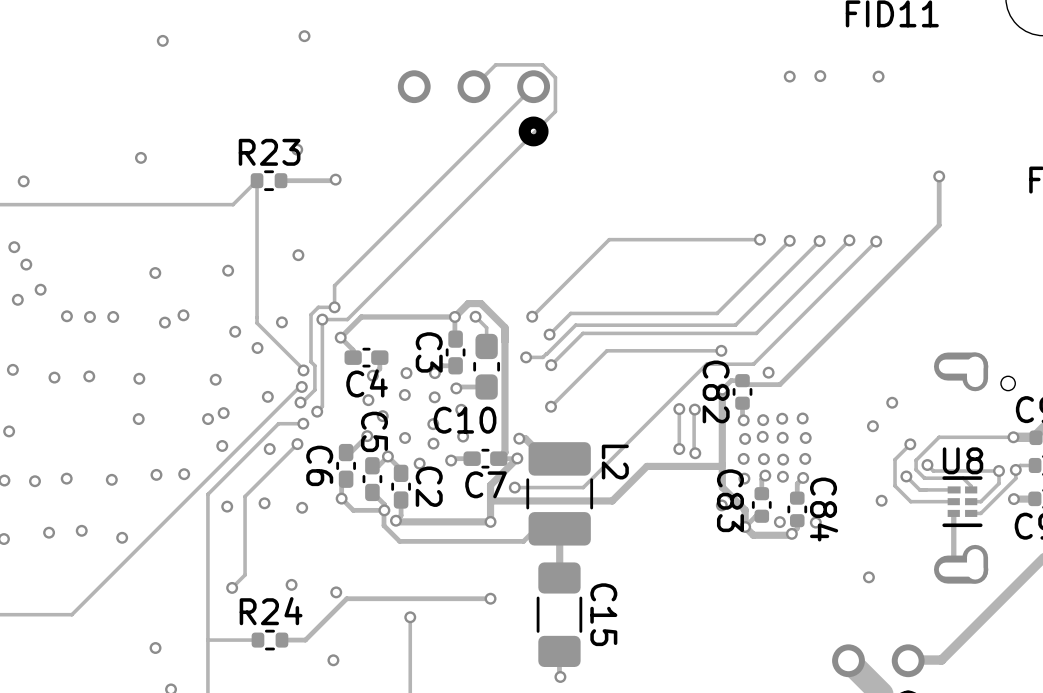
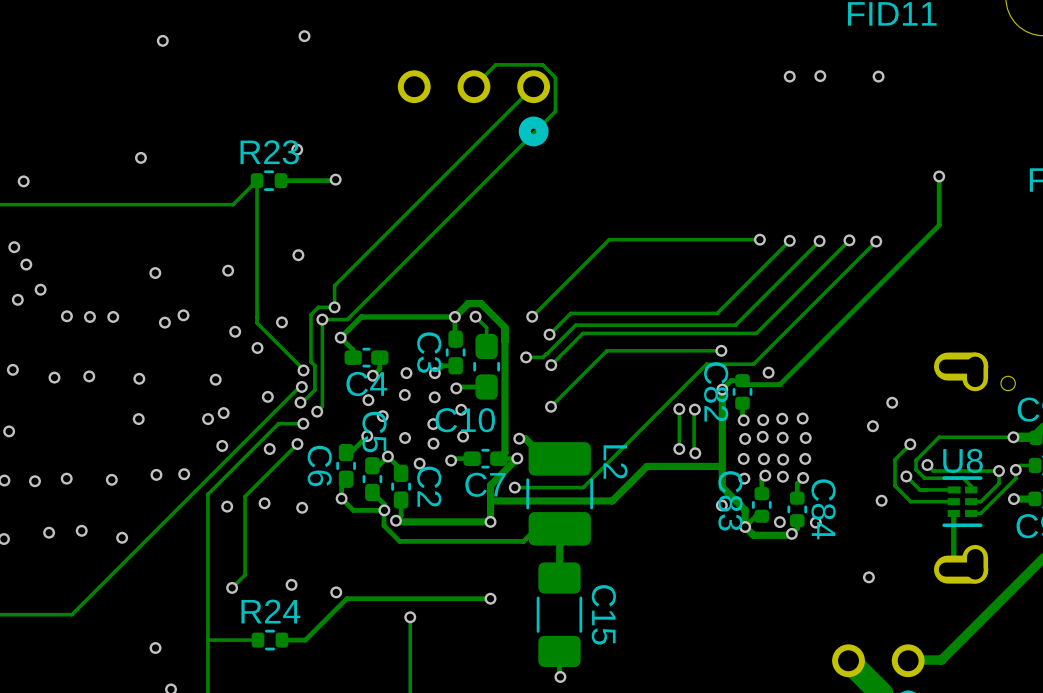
via: (333, 660) -> none

